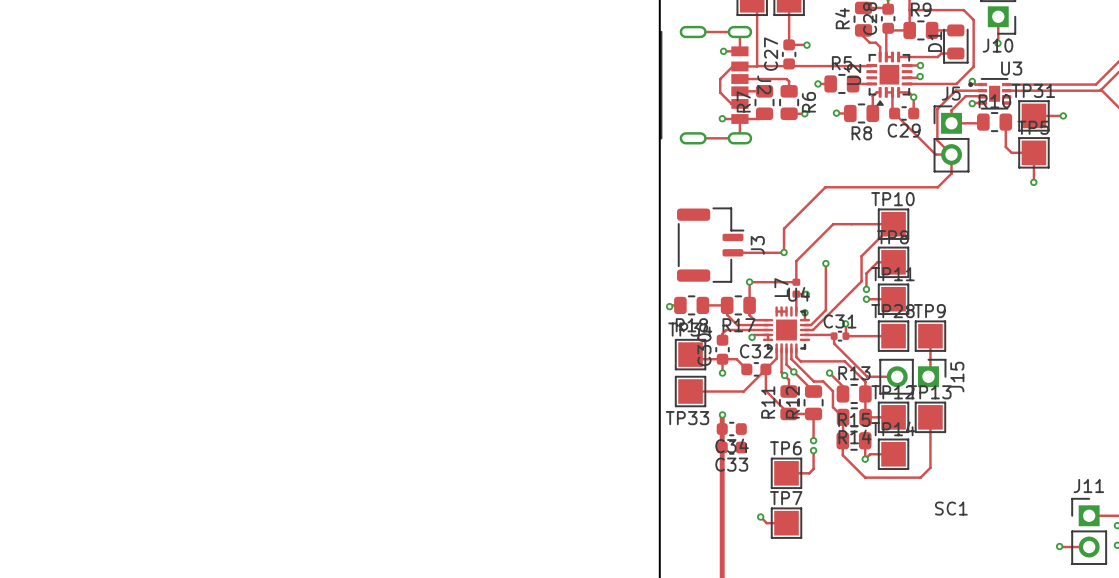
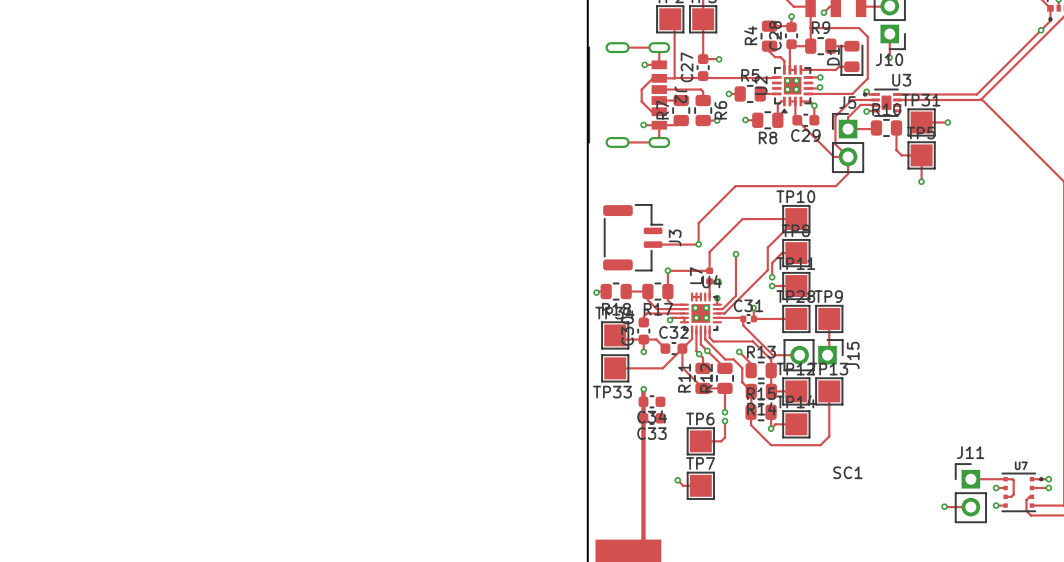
via: none -> (787, 80)
via: none -> (796, 80)
via: none -> (787, 89)
via: none -> (796, 89)
via: none -> (695, 307)
via: none -> (706, 307)
via: none -> (696, 317)
via: none -> (706, 317)

